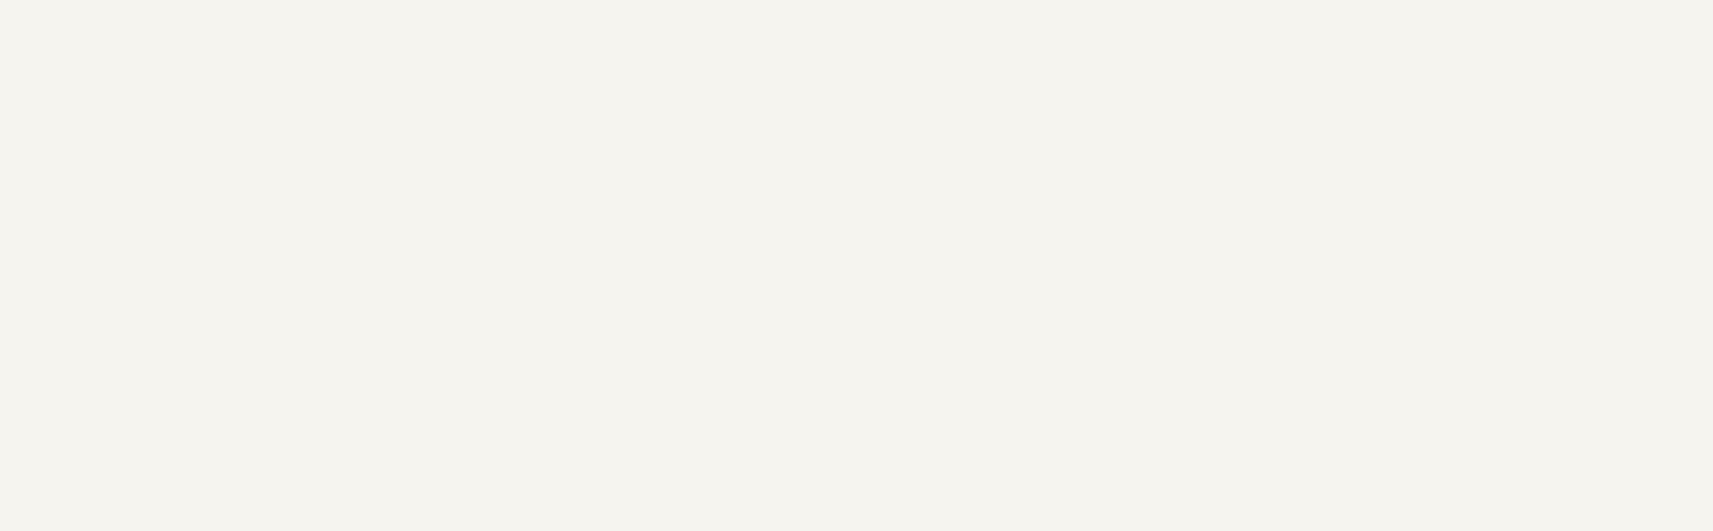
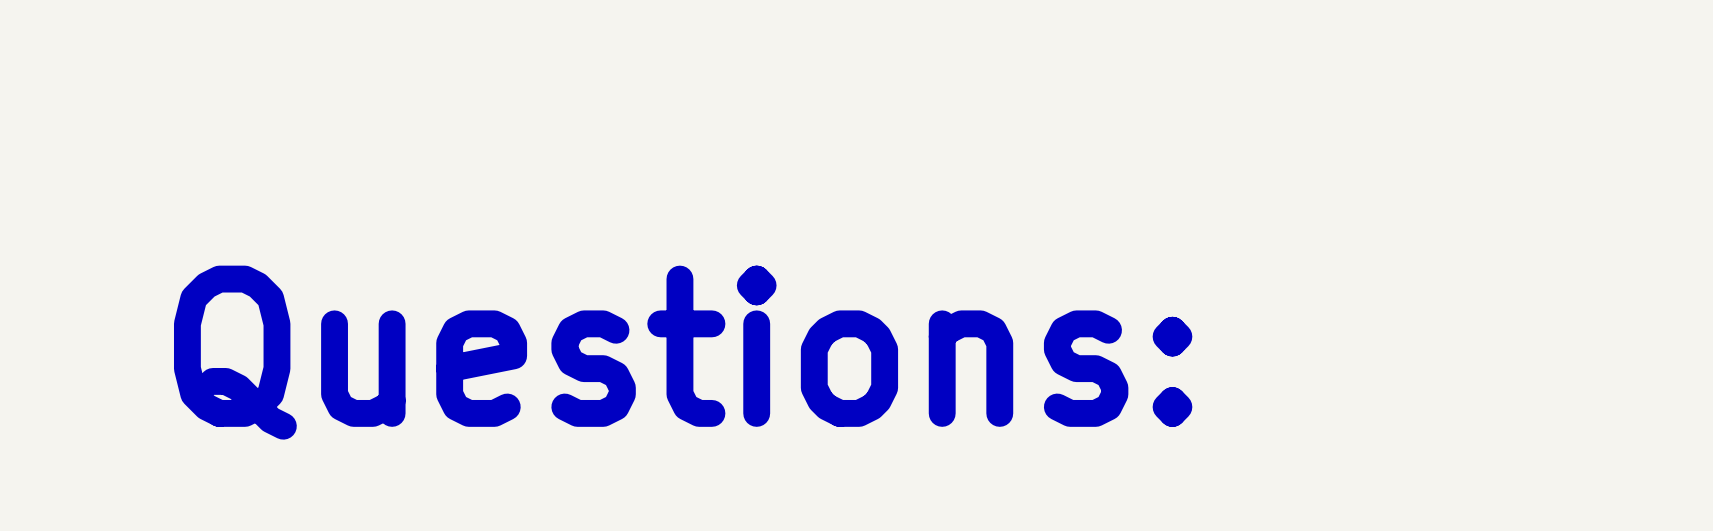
text: none -> Questions: (683, 352)

